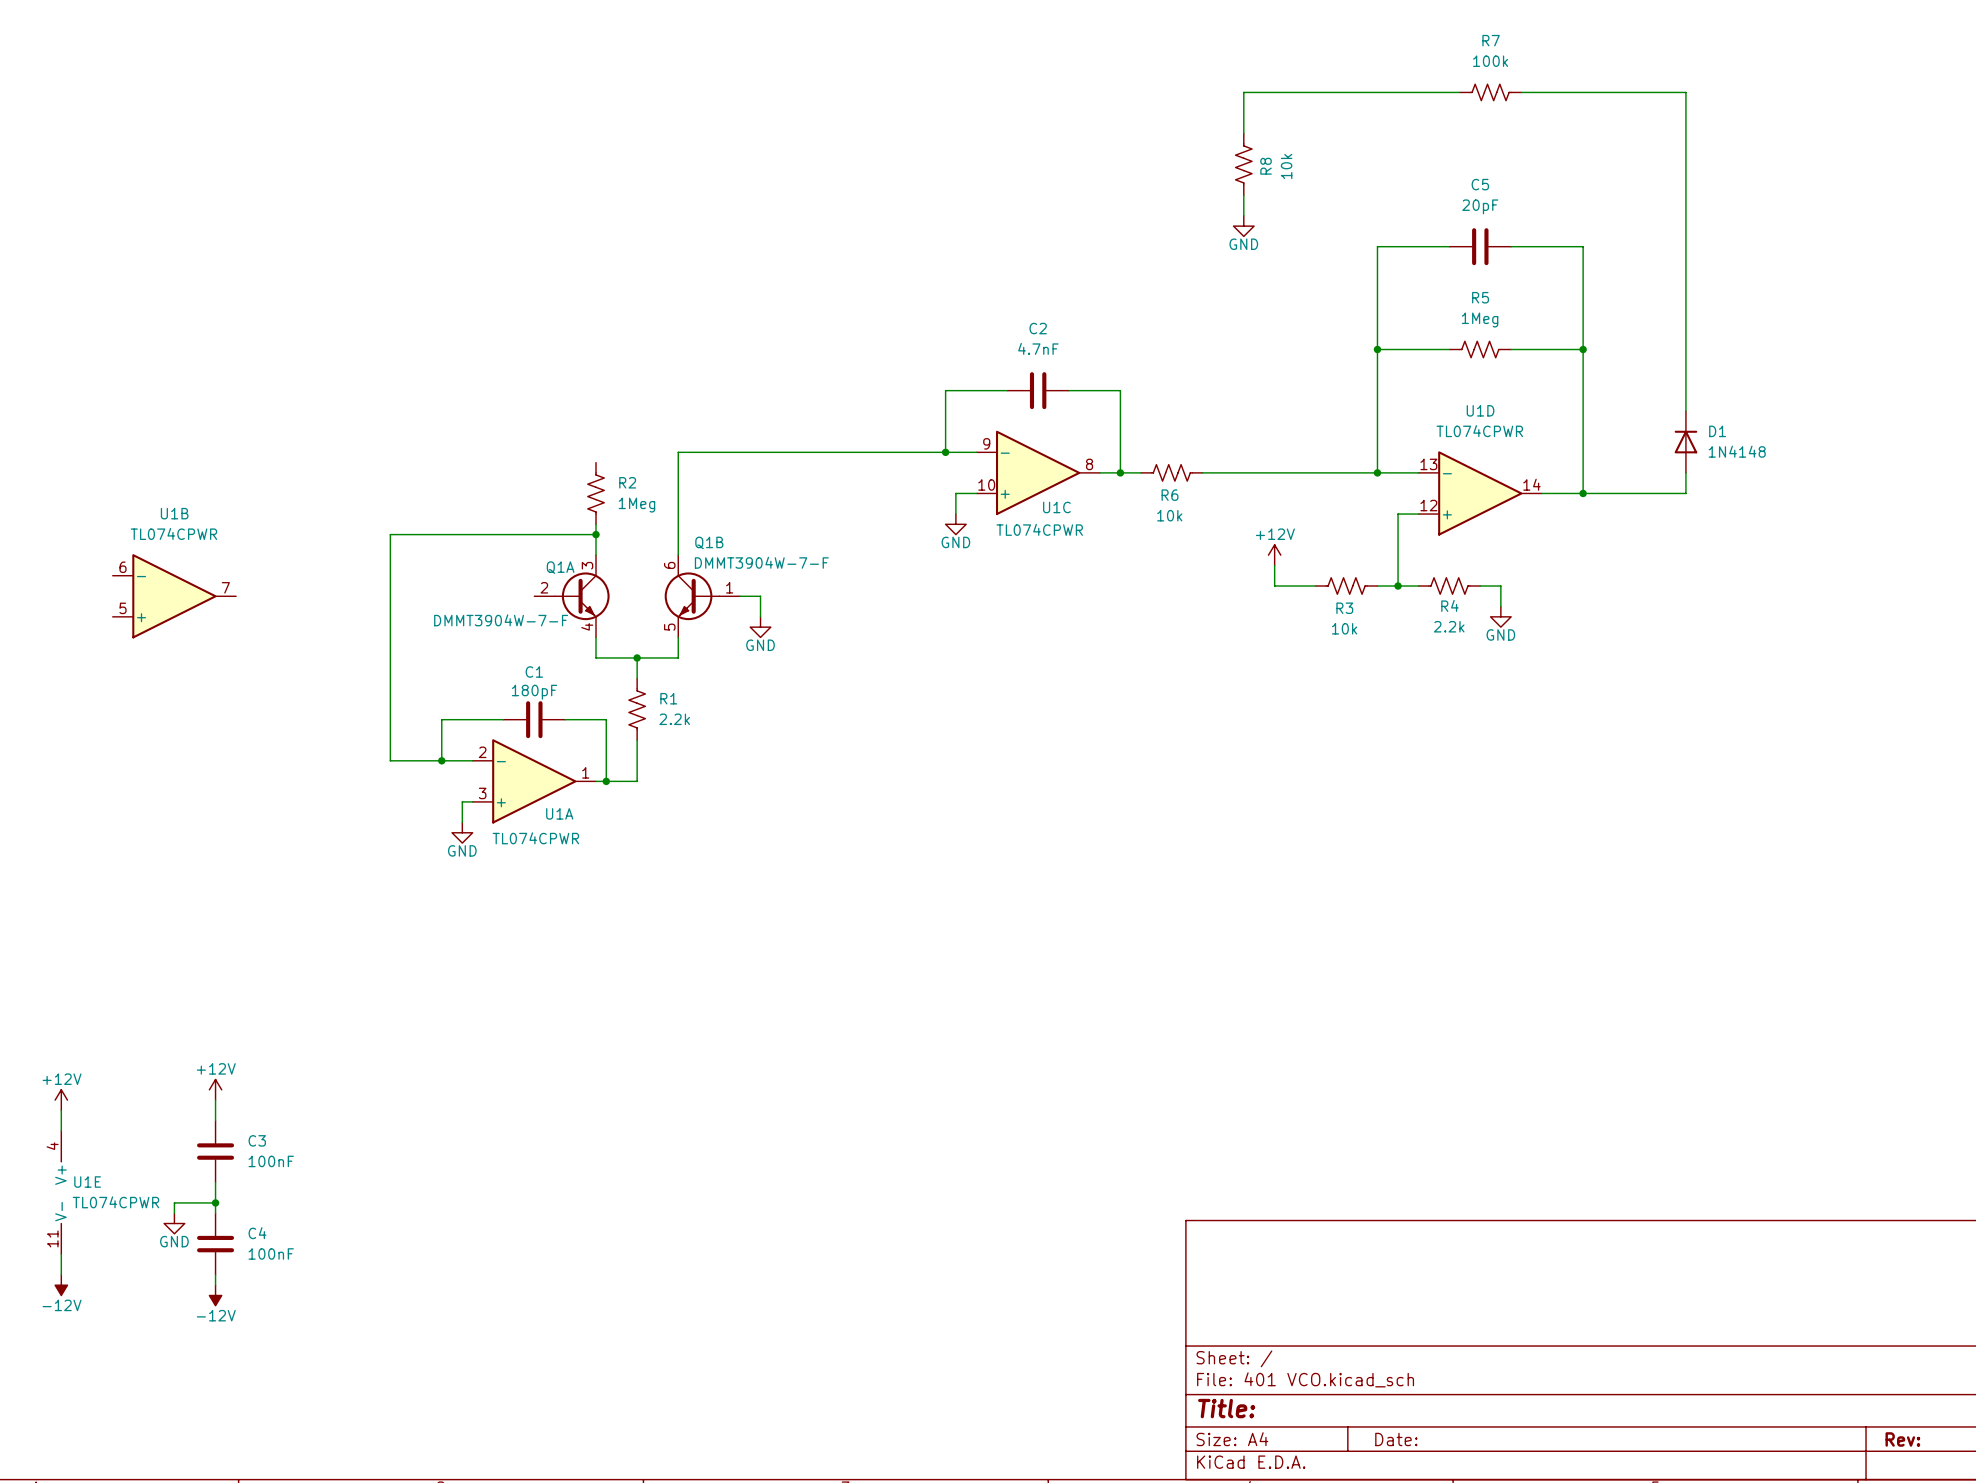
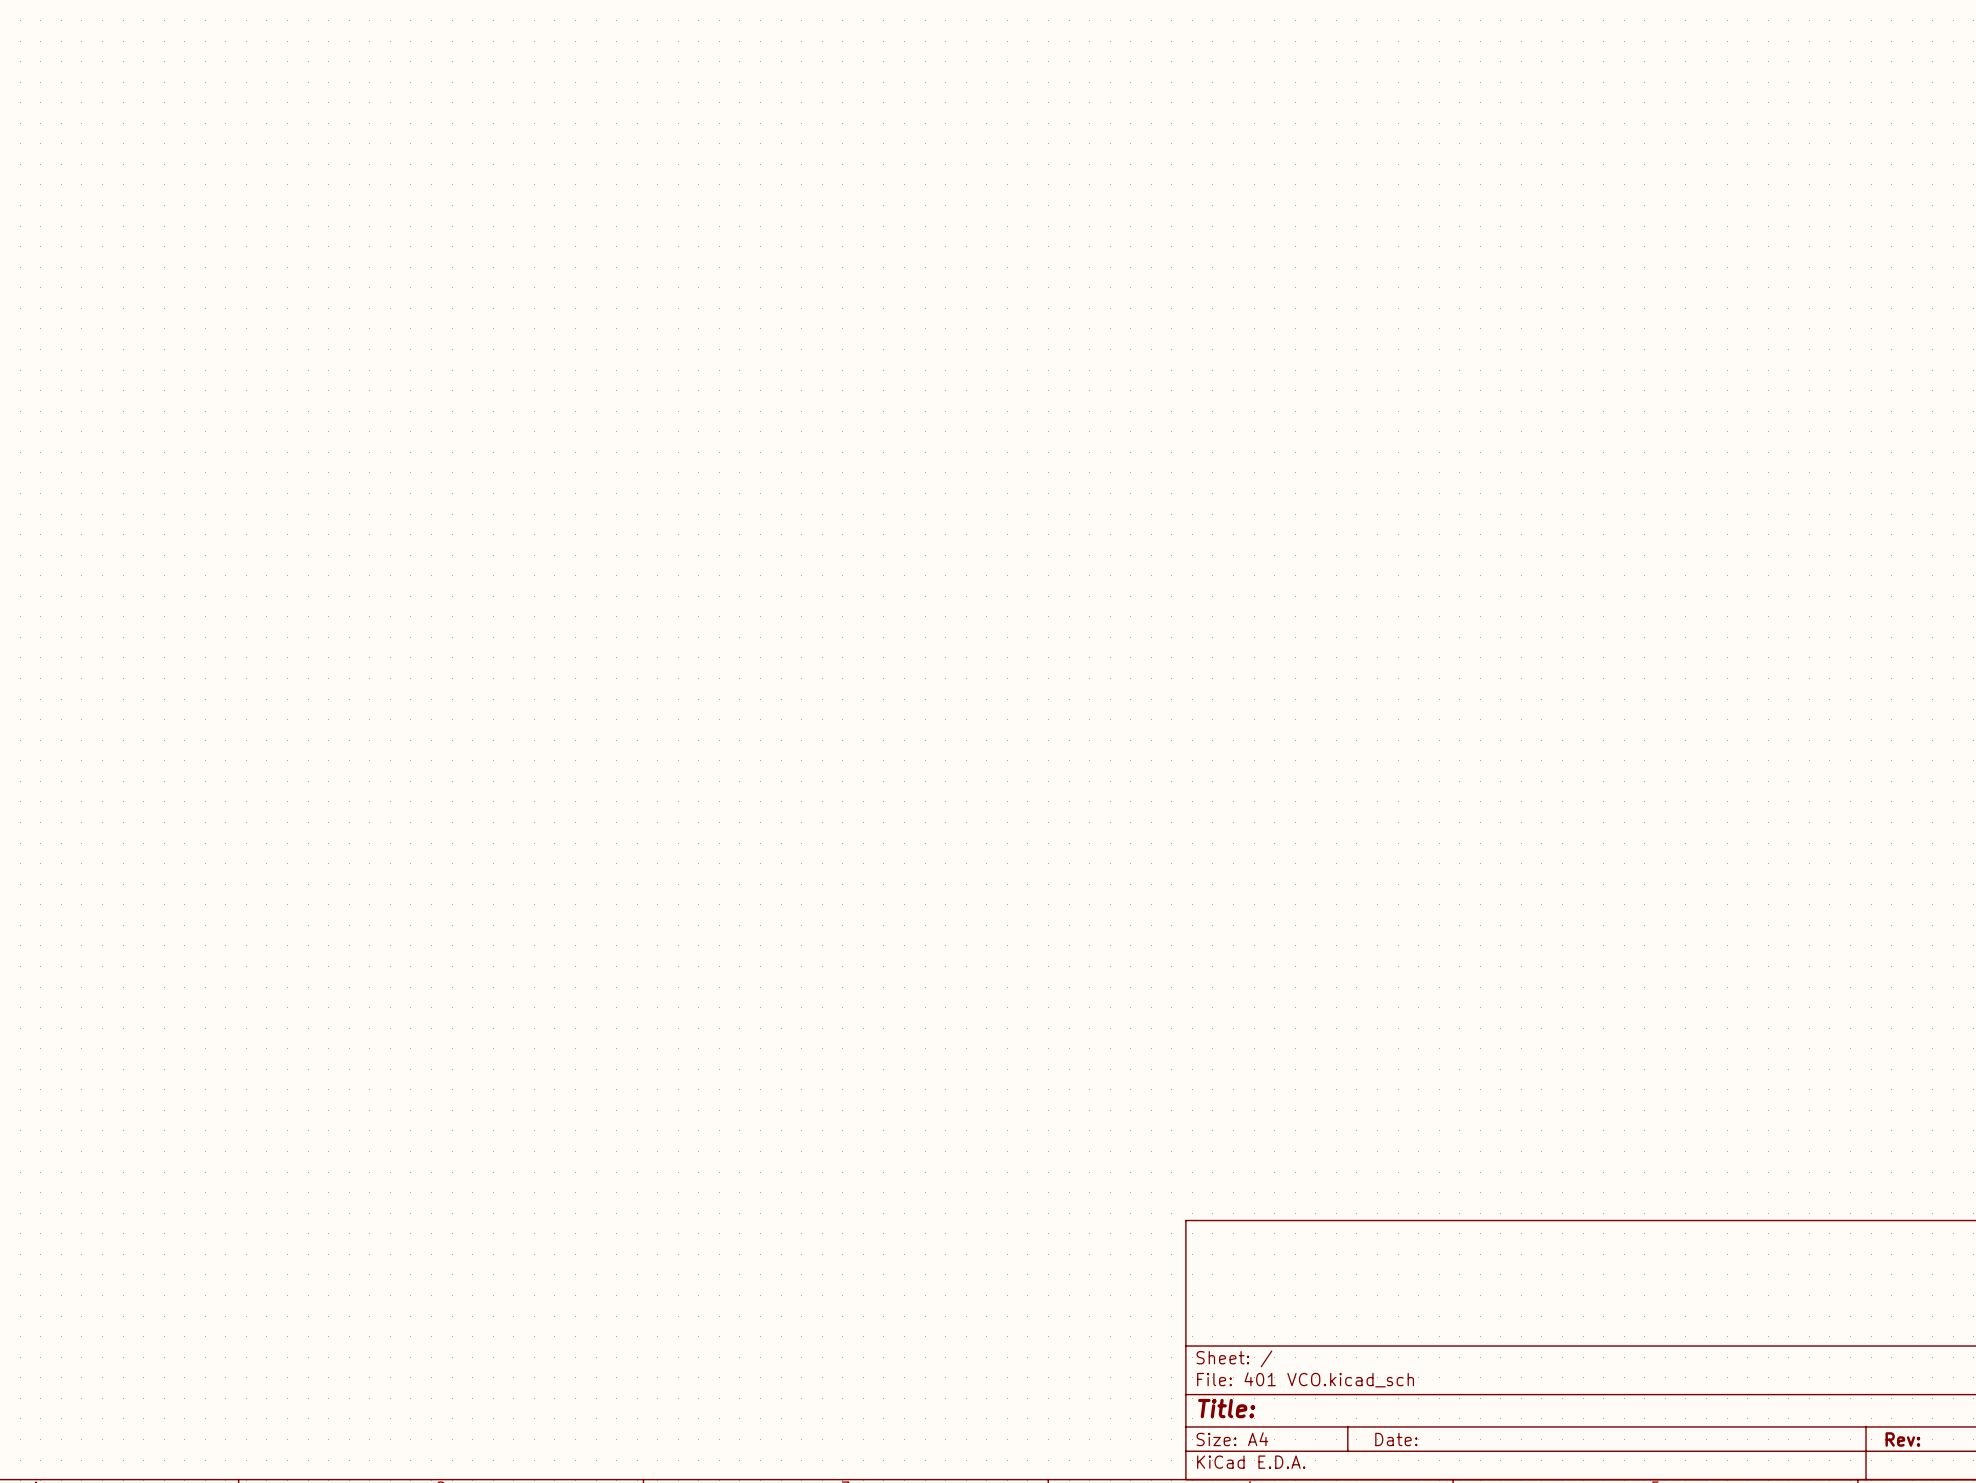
wire: (1459, 92) (1243, 92) (1243, 133) -> none
R7: 100k (1490, 92) -> none
wire: (1521, 92) (1685, 92) (1685, 411) -> none
R8: 10k (1243, 164) -> none
wire: (1243, 195) (1243, 215) -> none
power symbol: GND (1243, 226) -> none
wire: (1449, 246) (1377, 246) (1377, 472) -> none
C5: 20pF (1480, 246) -> none
wire: (1511, 246) (1583, 246) (1583, 493) -> none
wire: (1377, 349) (1449, 349) -> none
junction: (1377, 349) -> none
R5: 1Meg (1480, 349) -> none
wire: (1511, 349) (1583, 349) -> none
junction: (1583, 349) -> none
wire: (1007, 390) (945, 390) (945, 452) -> none
C2: 4.7nF (1038, 390) -> none
wire: (1069, 390) (1120, 390) (1120, 472) -> none
D1: 1N4148 (1685, 442) -> none
junction: (945, 452) -> none
wire: (976, 452) (678, 452) (678, 555) -> none
U1C: TL074CPWR (1038, 472) -> none
wire: (1099, 472) (1140, 472) -> none
junction: (1120, 472) -> none
R6: 10k (1171, 472) -> none
wire: (1202, 472) (1418, 472) -> none
junction: (1377, 472) -> none
wire: (1685, 472) (1685, 493) (1541, 493) -> none
R2: 1Meg (596, 493) -> none
wire: (976, 493) (955, 493) (955, 514) -> none
U1D: TL074CPWR (1480, 493) -> none
junction: (1583, 493) -> none
wire: (1418, 514) (1398, 514) (1398, 586) -> none
wire: (596, 524) (596, 555) -> none
power symbol: GND (955, 524) -> none
wire: (596, 534) (390, 534) (390, 760) (472, 760) -> none
junction: (596, 534) -> none
power symbol: +12V (1274, 555) -> none
wire: (1274, 565) (1274, 586) (1315, 586) -> none
R3: 10k (1346, 586) -> none
wire: (1377, 586) (1418, 586) -> none
junction: (1398, 586) -> none
R4: 2.2k (1449, 586) -> none
wire: (1480, 586) (1500, 586) (1500, 606) -> none
U1B: TL074CPWR (174, 596) -> none
Q1A: DMMT3904W-7-F (571, 596) -> none
Q1B: DMMT3904W-7-F (702, 596) -> none
wire: (739, 596) (760, 596) (760, 616) -> none
power symbol: GND (1500, 616) -> none
power symbol: GND (760, 627) -> none
wire: (596, 637) (596, 657) (678, 657) (678, 637) -> none
wire: (637, 657) (637, 678) -> none
junction: (637, 657) -> none
R1: 2.2k (637, 709) -> none
wire: (503, 719) (441, 719) (441, 760) -> none
C1: 180pF (534, 719) -> none
wire: (565, 719) (606, 719) (606, 781) -> none
wire: (637, 740) (637, 781) (596, 781) -> none
junction: (441, 760) -> none
U1A: TL074CPWR (534, 781) -> none
junction: (606, 781) -> none
wire: (472, 801) (462, 801) (462, 822) -> none
power symbol: GND (462, 832) -> none
power symbol: +12V (215, 1089) -> none
power symbol: +12V (61, 1100) -> none
wire: (215, 1100) (215, 1120) -> none
wire: (61, 1110) (61, 1130) -> none
C3: 100nF (215, 1151) -> none
wire: (215, 1182) (215, 1213) -> none
U1E: TL074CPWR (61, 1192) -> none
wire: (215, 1202) (174, 1202) (174, 1213) -> none
junction: (215, 1202) -> none
power symbol: GND (174, 1223) -> none
C4: 100nF (215, 1244) -> none
wire: (61, 1254) (61, 1274) -> none
wire: (215, 1274) (215, 1285) -> none
power symbol: -12V (61, 1285) -> none
power symbol: -12V (215, 1295) -> none

